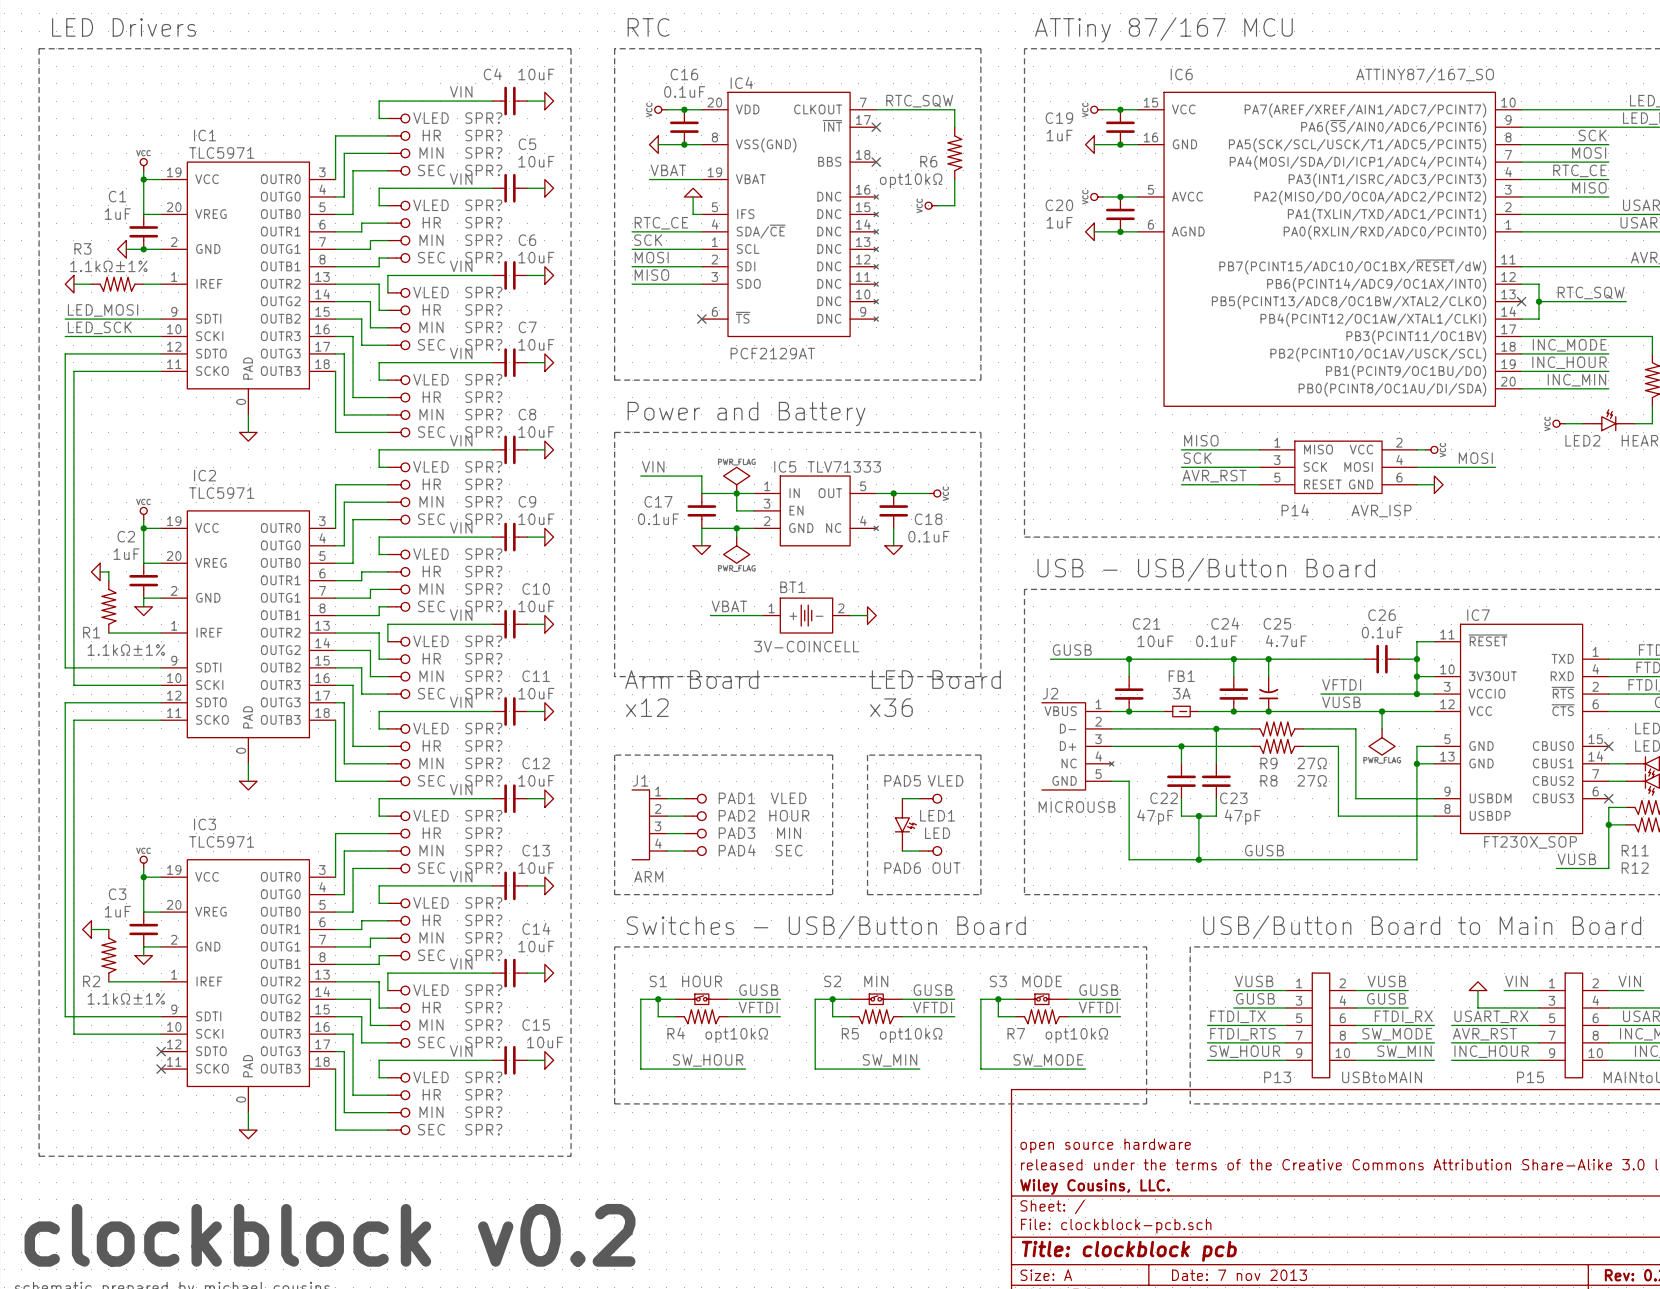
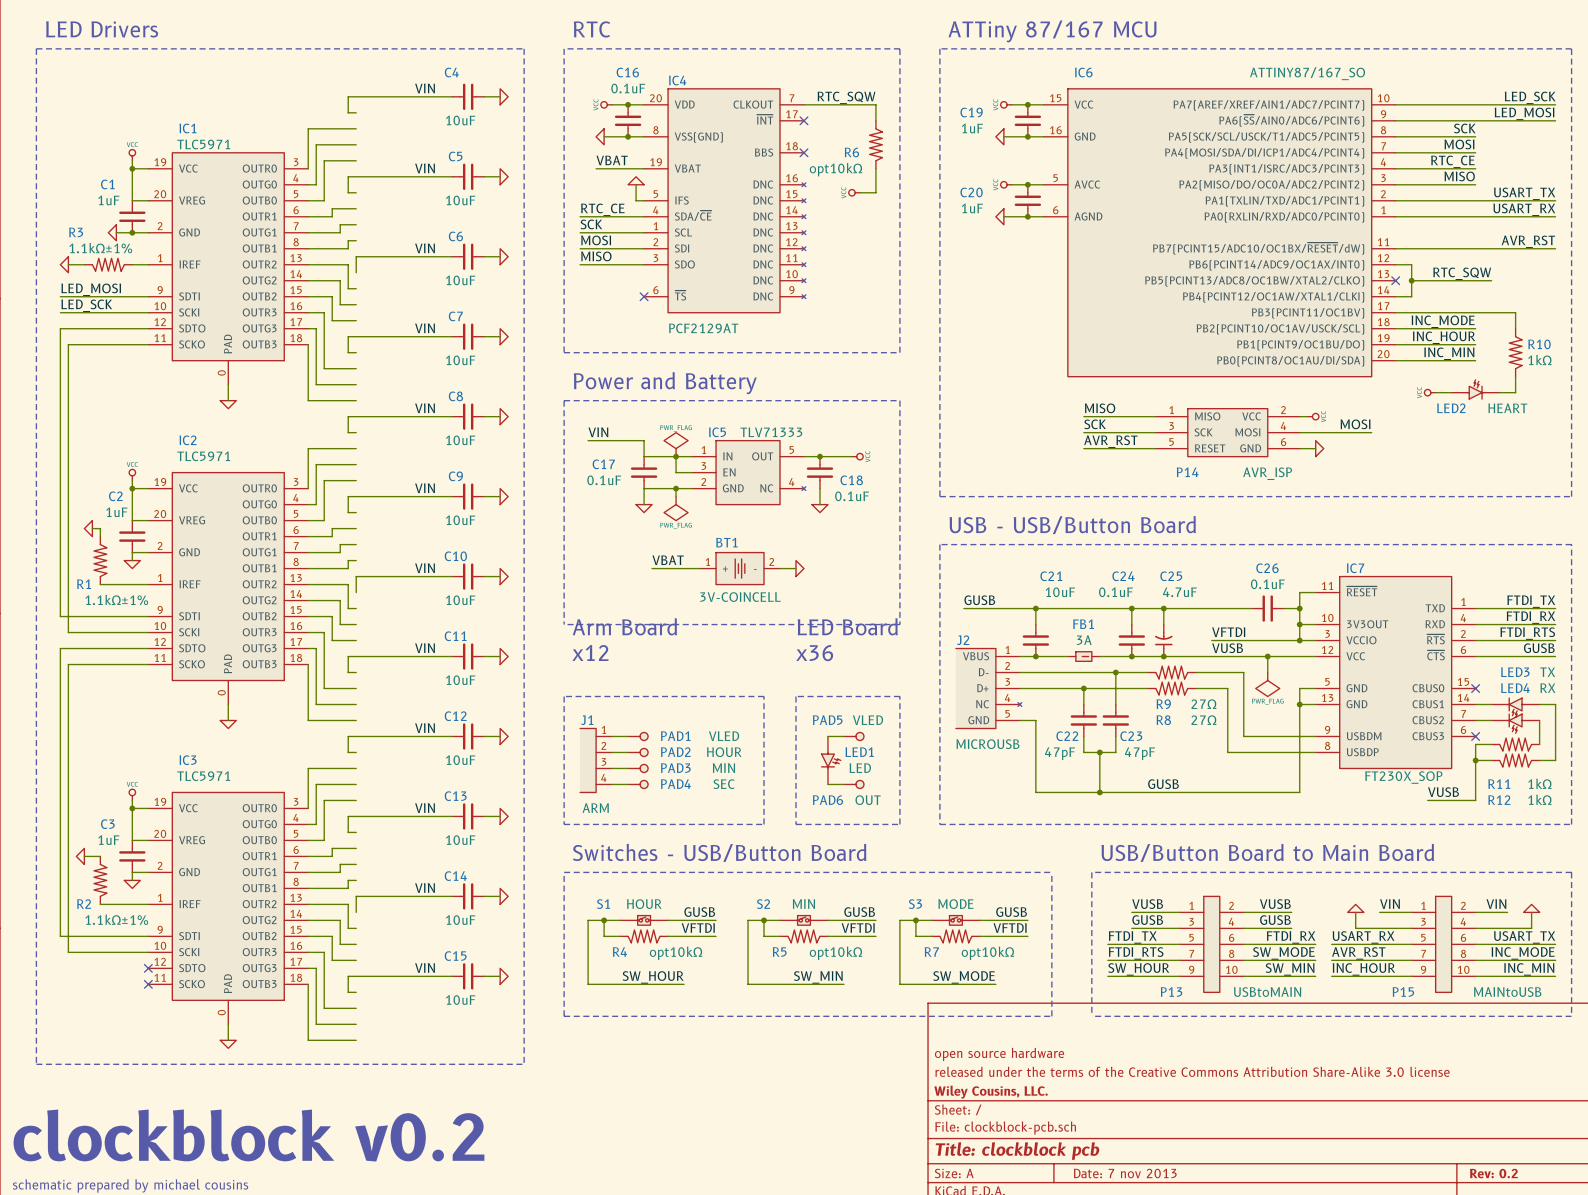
C4 value position: 10uF (536, 74) -> 10uF (460, 120)
SPR?: VLED (398, 118) -> none
SPR?: HR (398, 135) -> none
C5 name position: C5 (527, 144) -> C5 (455, 156)
SPR?: MIN (398, 153) -> none
C5 value position: 10uF (536, 161) -> 10uF (460, 200)
SPR?: SEC (398, 170) -> none
SPR?: VLED (398, 205) -> none
SPR?: HR (398, 223) -> none
SPR?: MIN (398, 240) -> none
C6 name position: C6 (527, 240) -> C6 (455, 236)
C6 value position: 10uF (536, 257) -> 10uF (460, 280)
SPR?: SEC (398, 258) -> none
SPR?: VLED (398, 292) -> none
SPR?: HR (398, 310) -> none
SPR?: MIN (398, 327) -> none
C7 name position: C7 (527, 327) -> C7 (455, 316)
C7 value position: 10uF (536, 344) -> 10uF (460, 360)
SPR?: SEC (398, 345) -> none
SPR?: VLED (398, 380) -> none
SPR?: HR (398, 397) -> none
SPR?: MIN (398, 414) -> none
C8 name position: C8 (527, 414) -> C8 (455, 396)
SPR?: SEC (398, 432) -> none
C8 value position: 10uF (536, 432) -> 10uF (460, 440)
SPR?: VLED (398, 467) -> none
SPR?: HR (398, 484) -> none
C9 name position: C9 (527, 501) -> C9 (455, 476)
SPR?: MIN (398, 502) -> none
SPR?: SEC (398, 519) -> none
C9 value position: 10uF (536, 519) -> 10uF (460, 520)
SPR?: VLED (398, 554) -> none
SPR?: HR (398, 571) -> none
SPR?: MIN (398, 589) -> none
C10 name position: C10 (536, 589) -> C10 (455, 556)
SPR?: SEC (398, 606) -> none
C10 value position: 10uF (536, 606) -> 10uF (460, 600)
SPR?: VLED (398, 641) -> none
SPR?: HR (398, 659) -> none
SPR?: MIN (398, 676) -> none
C11 name position: C11 (536, 676) -> C11 (455, 636)
C11 value position: 10uF (536, 693) -> 10uF (460, 680)
SPR?: SEC (398, 694) -> none
SPR?: VLED (398, 728) -> none
SPR?: HR (398, 746) -> none
SPR?: MIN (398, 763) -> none
C12 name position: C12 (536, 763) -> C12 (455, 716)
C12 value position: 10uF (536, 780) -> 10uF (460, 760)
SPR?: SEC (398, 781) -> none
SPR?: VLED (398, 816) -> none
SPR?: HR (398, 833) -> none
C13 name position: C13 (536, 850) -> C13 (455, 796)
SPR?: MIN (398, 851) -> none
SPR?: SEC (398, 868) -> none
C13 value position: 10uF (536, 868) -> 10uF (460, 840)
SPR?: VLED (398, 903) -> none
SPR?: HR (398, 920) -> none
C14 name position: C14 (536, 928) -> C14 (455, 876)
SPR?: MIN (398, 938) -> none
C14 value position: 10uF (536, 946) -> 10uF (460, 920)
SPR?: SEC (398, 955) -> none
SPR?: VLED (398, 990) -> none
SPR?: HR (398, 1007) -> none
SPR?: MIN (398, 1025) -> none
C15 name position: C15 (536, 1025) -> C15 (455, 956)
SPR?: SEC (398, 1042) -> none
C15 value position: 10uF (545, 1042) -> 10uF (460, 1000)
SPR?: VLED (398, 1077) -> none
SPR?: HR (398, 1095) -> none
SPR?: MIN (398, 1112) -> none
SPR?: SEC (398, 1130) -> none

